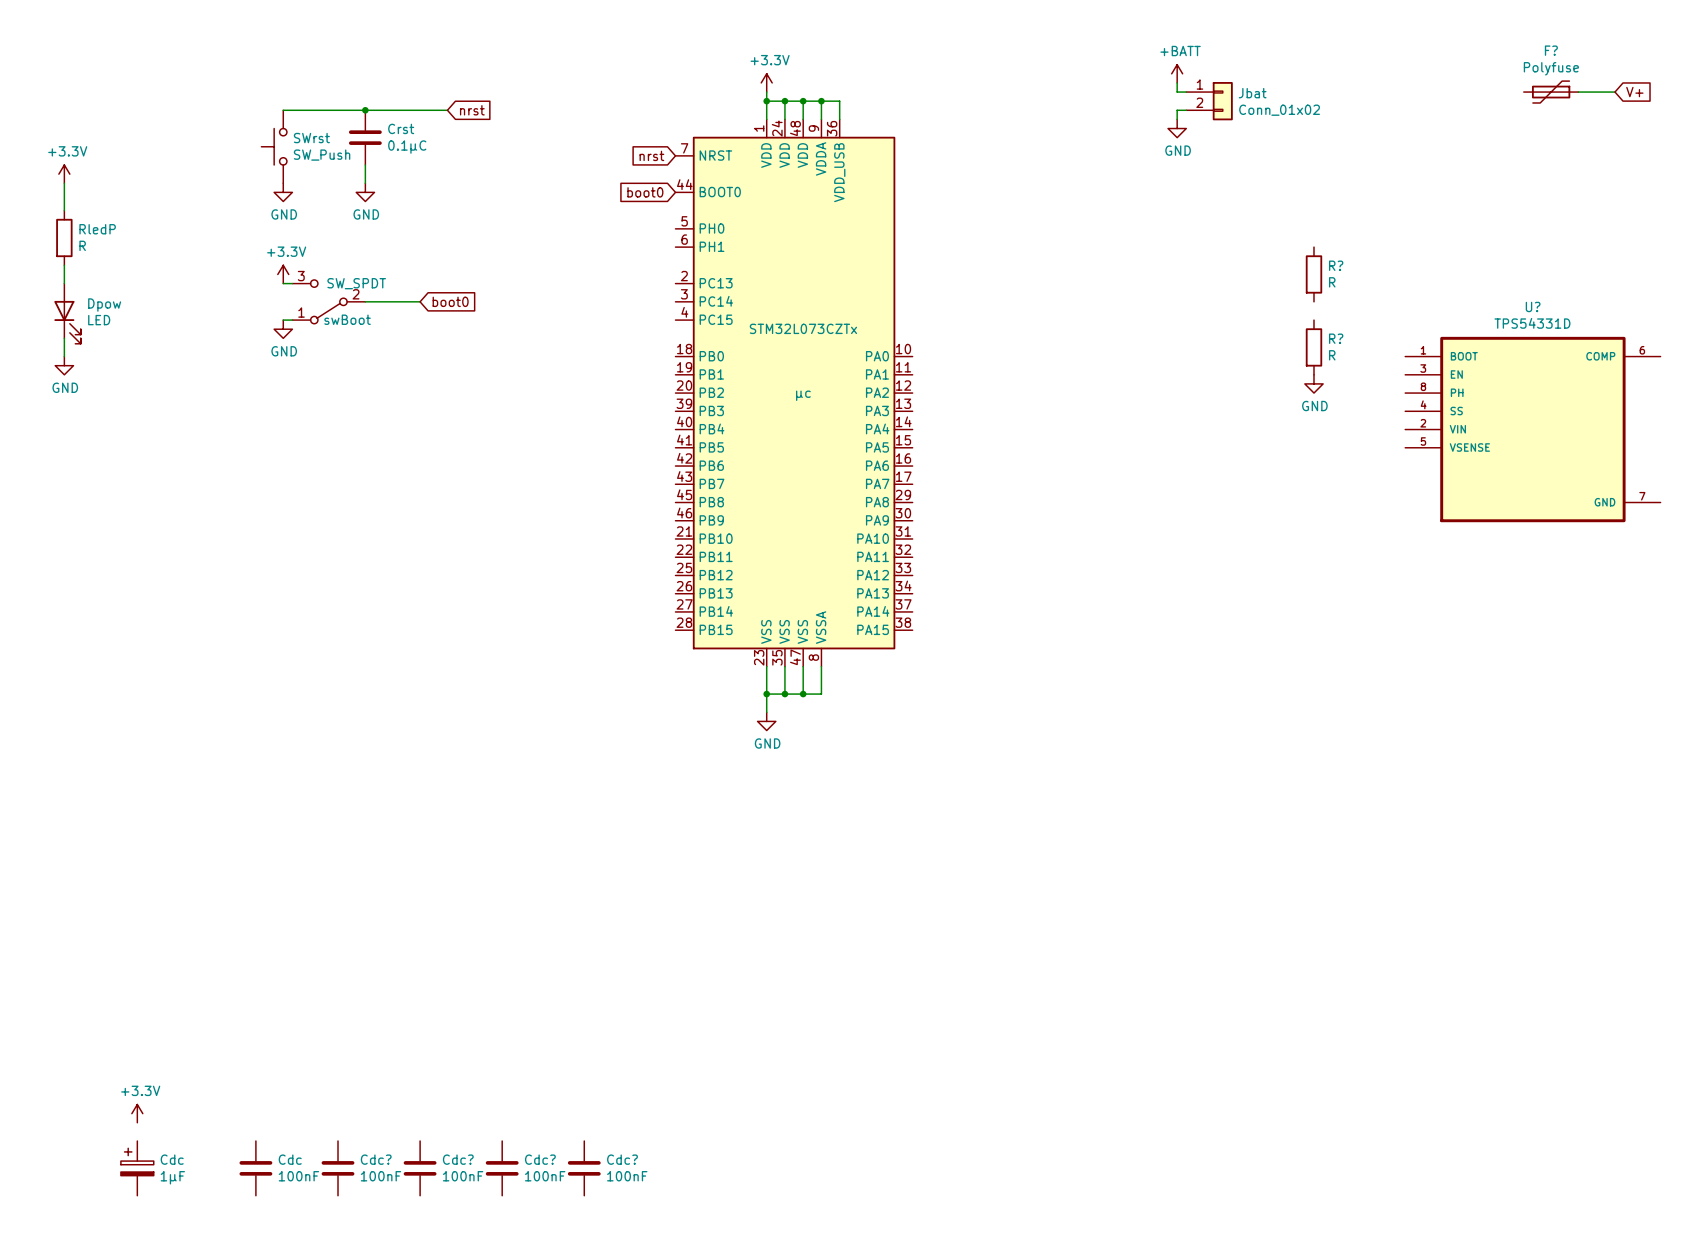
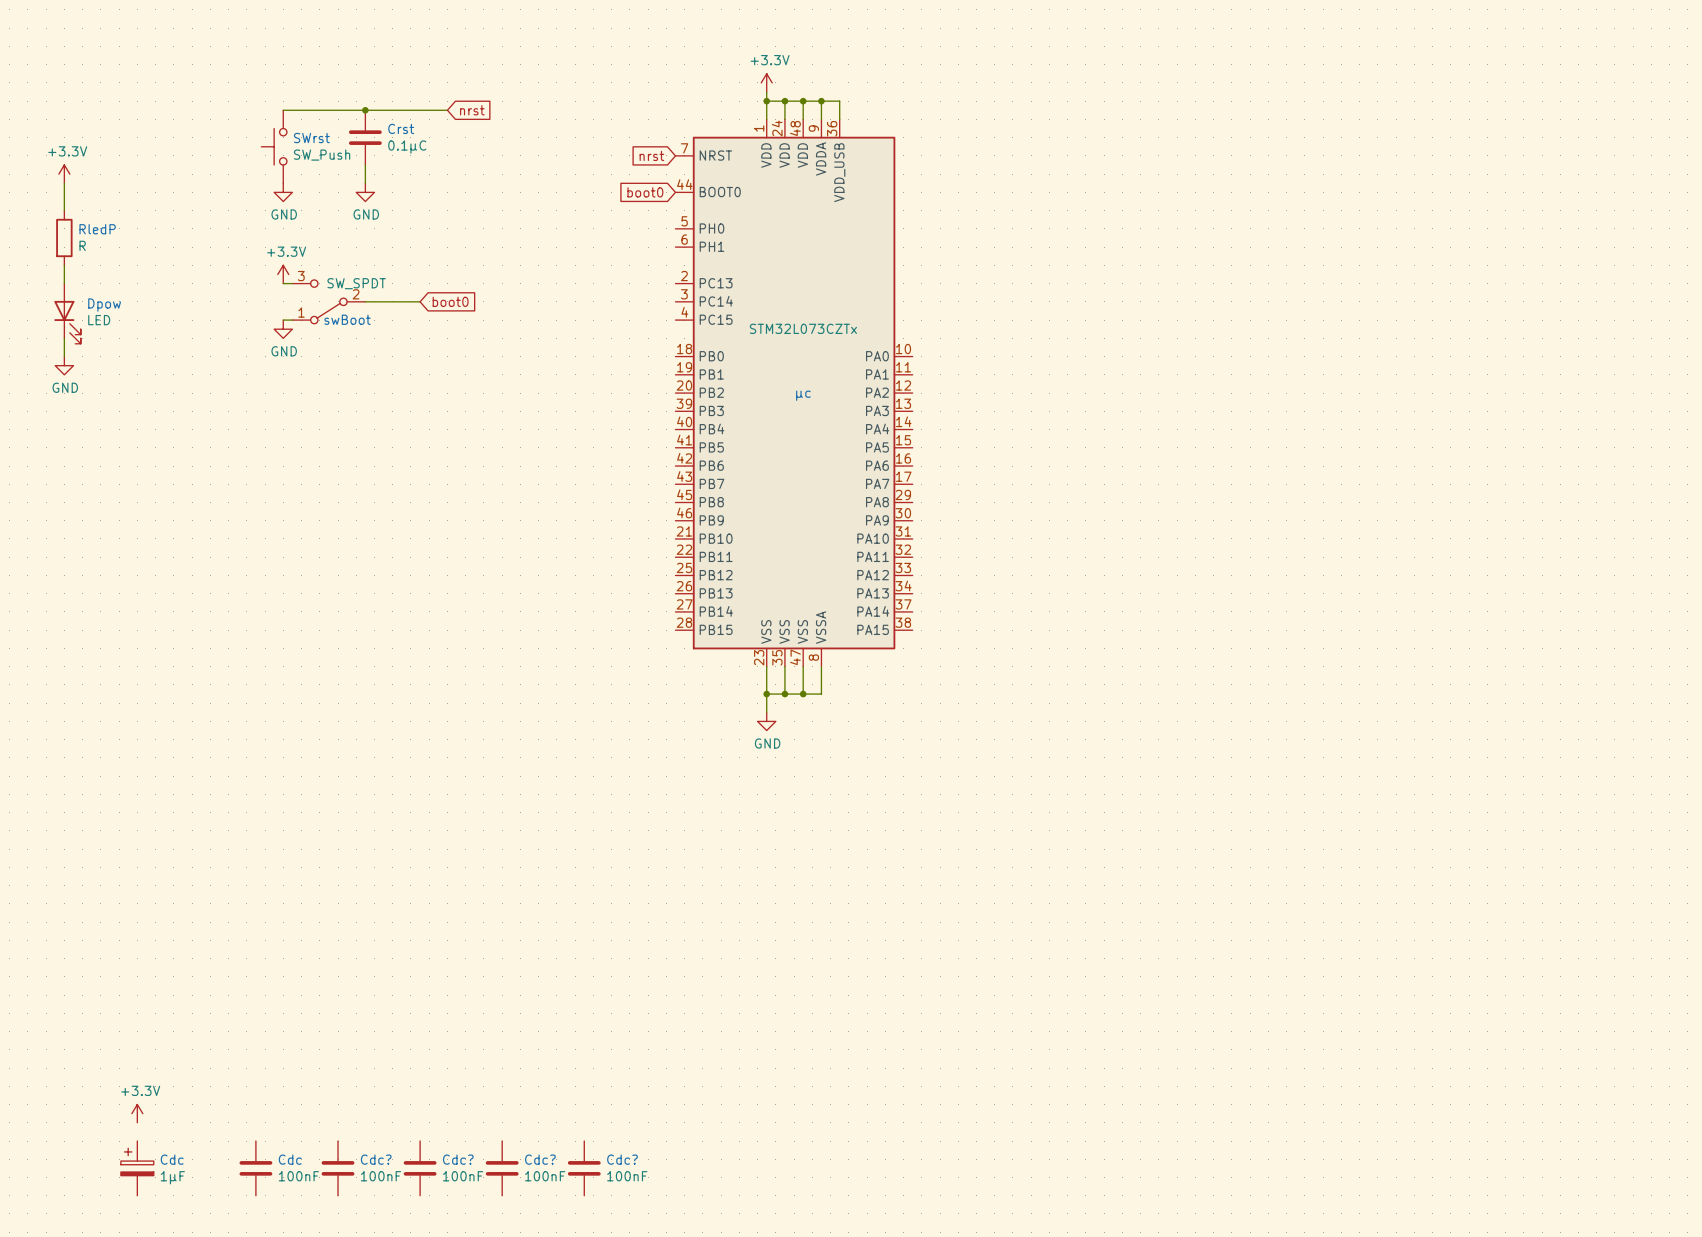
power symbol: +BATT (1177, 73) -> none
wire: (1177, 82) (1177, 92) (1186, 92) -> none
F?: Polyfuse (1551, 92) -> none
wire: (1578, 92) (1614, 92) -> none
global label: V+ (1634, 92) -> none
Jbat: Conn_01x02 (1209, 101) -> none
wire: (1186, 110) (1177, 110) (1177, 119) -> none
power symbol: GND (1177, 128) -> none
R?: R (1313, 274) -> none
R?: R (1313, 347) -> none
power symbol: GND (1313, 383) -> none
U?: TPS54331D (1532, 429) -> none

